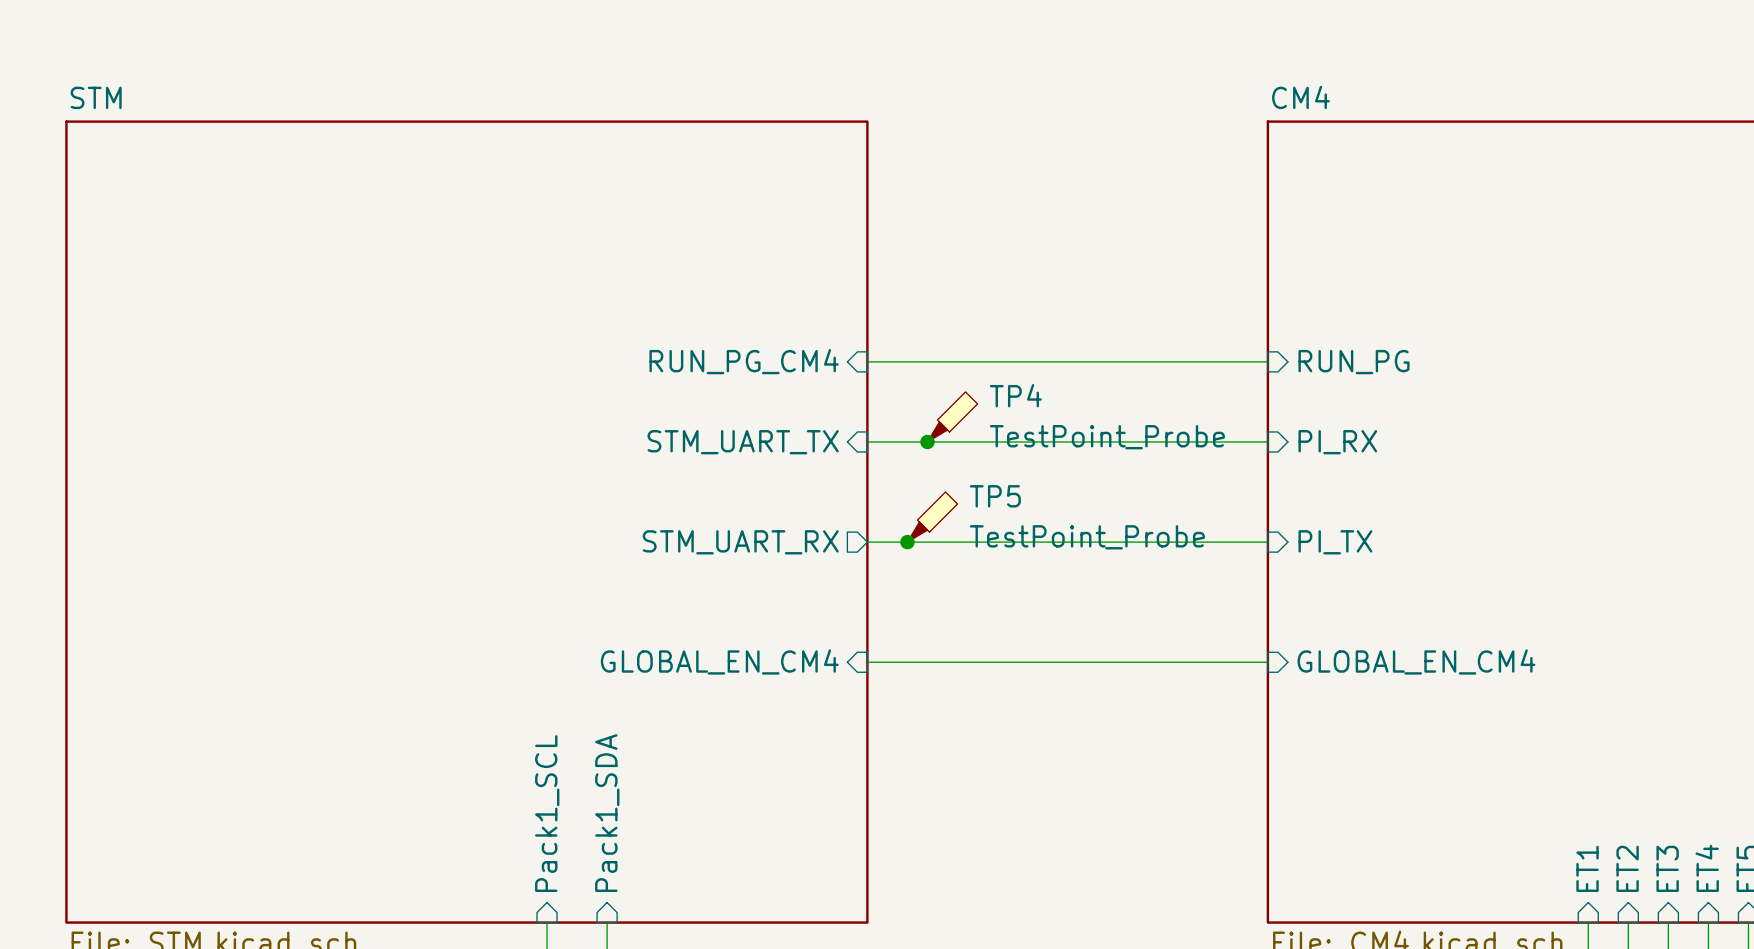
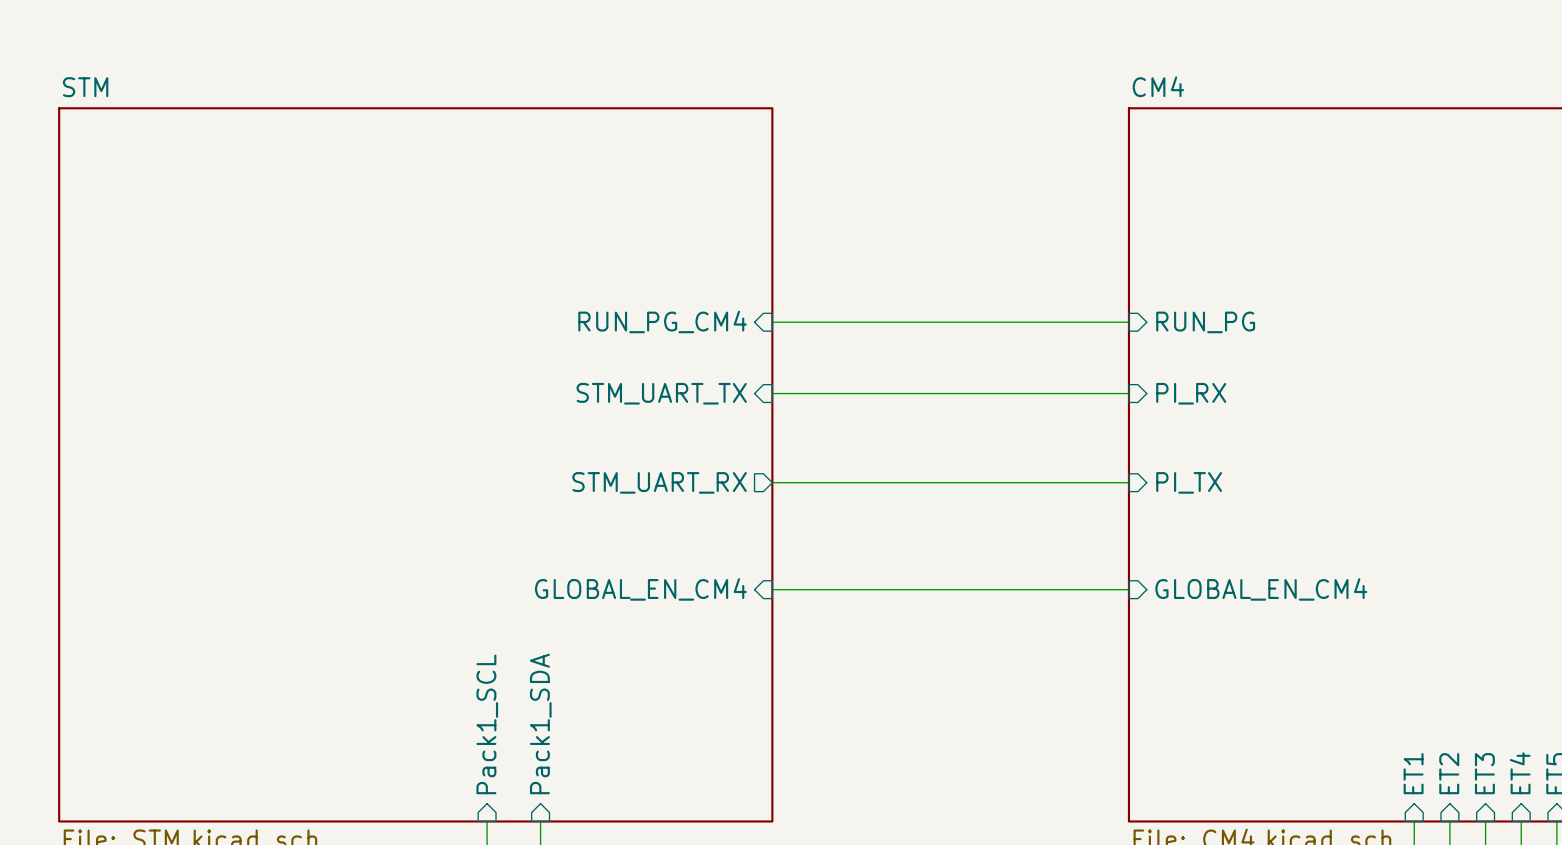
TP4: TestPoint_Probe (952, 416) -> none
junction: (927, 441) -> none
TP5: TestPoint_Probe (932, 517) -> none
junction: (907, 542) -> none

